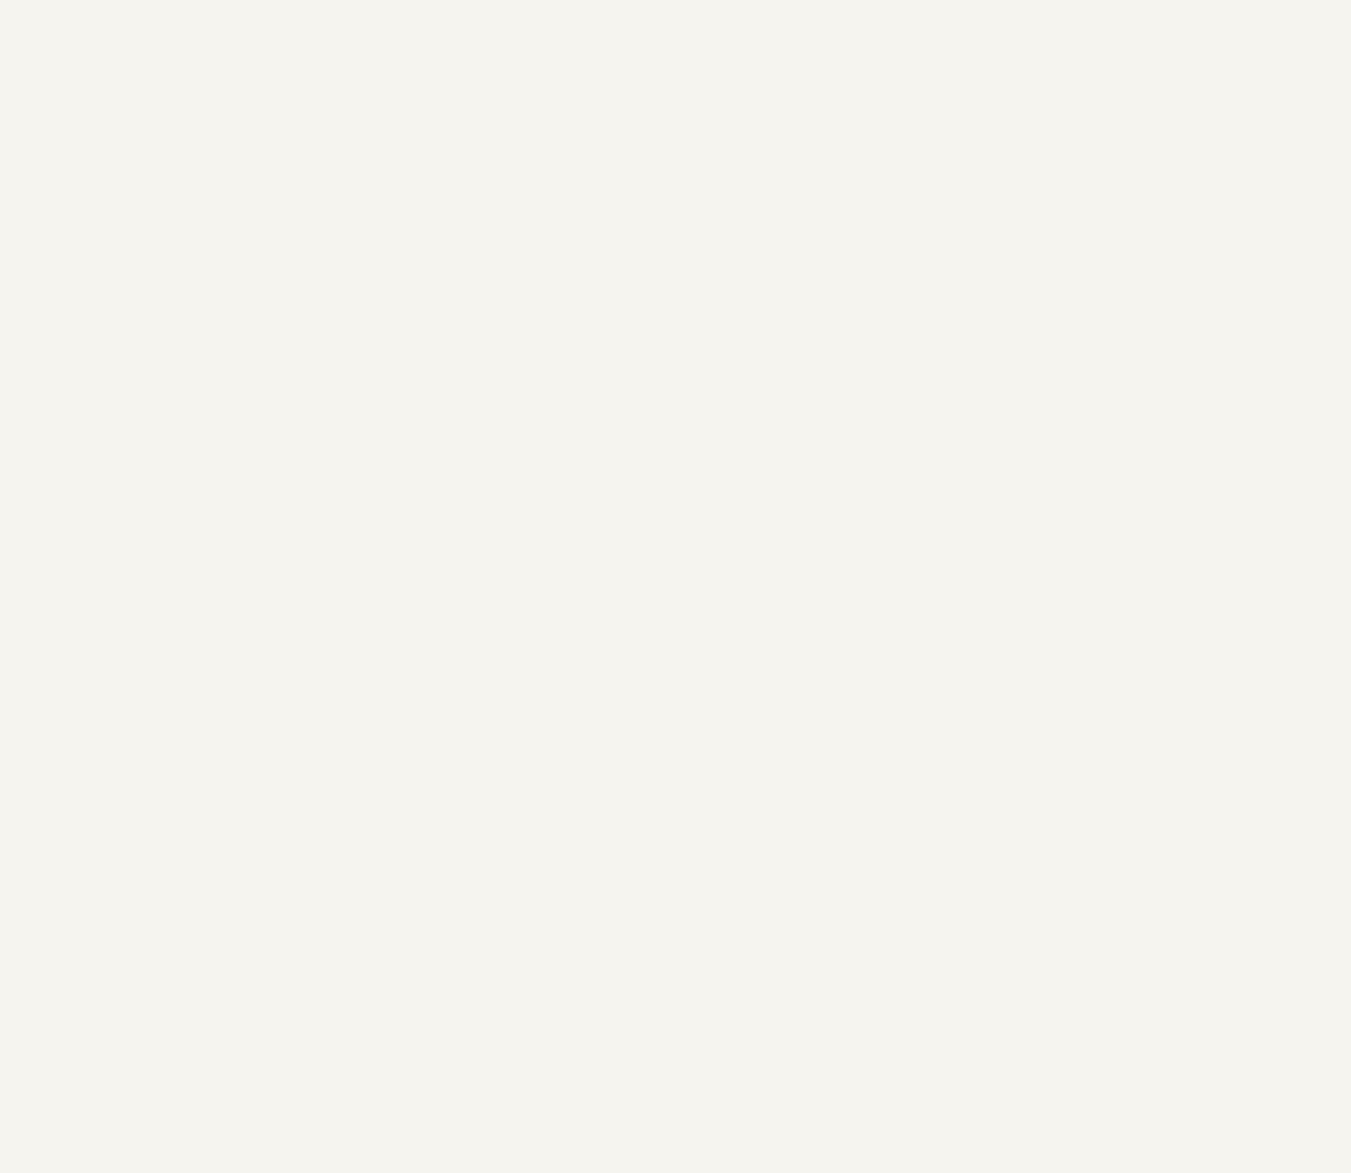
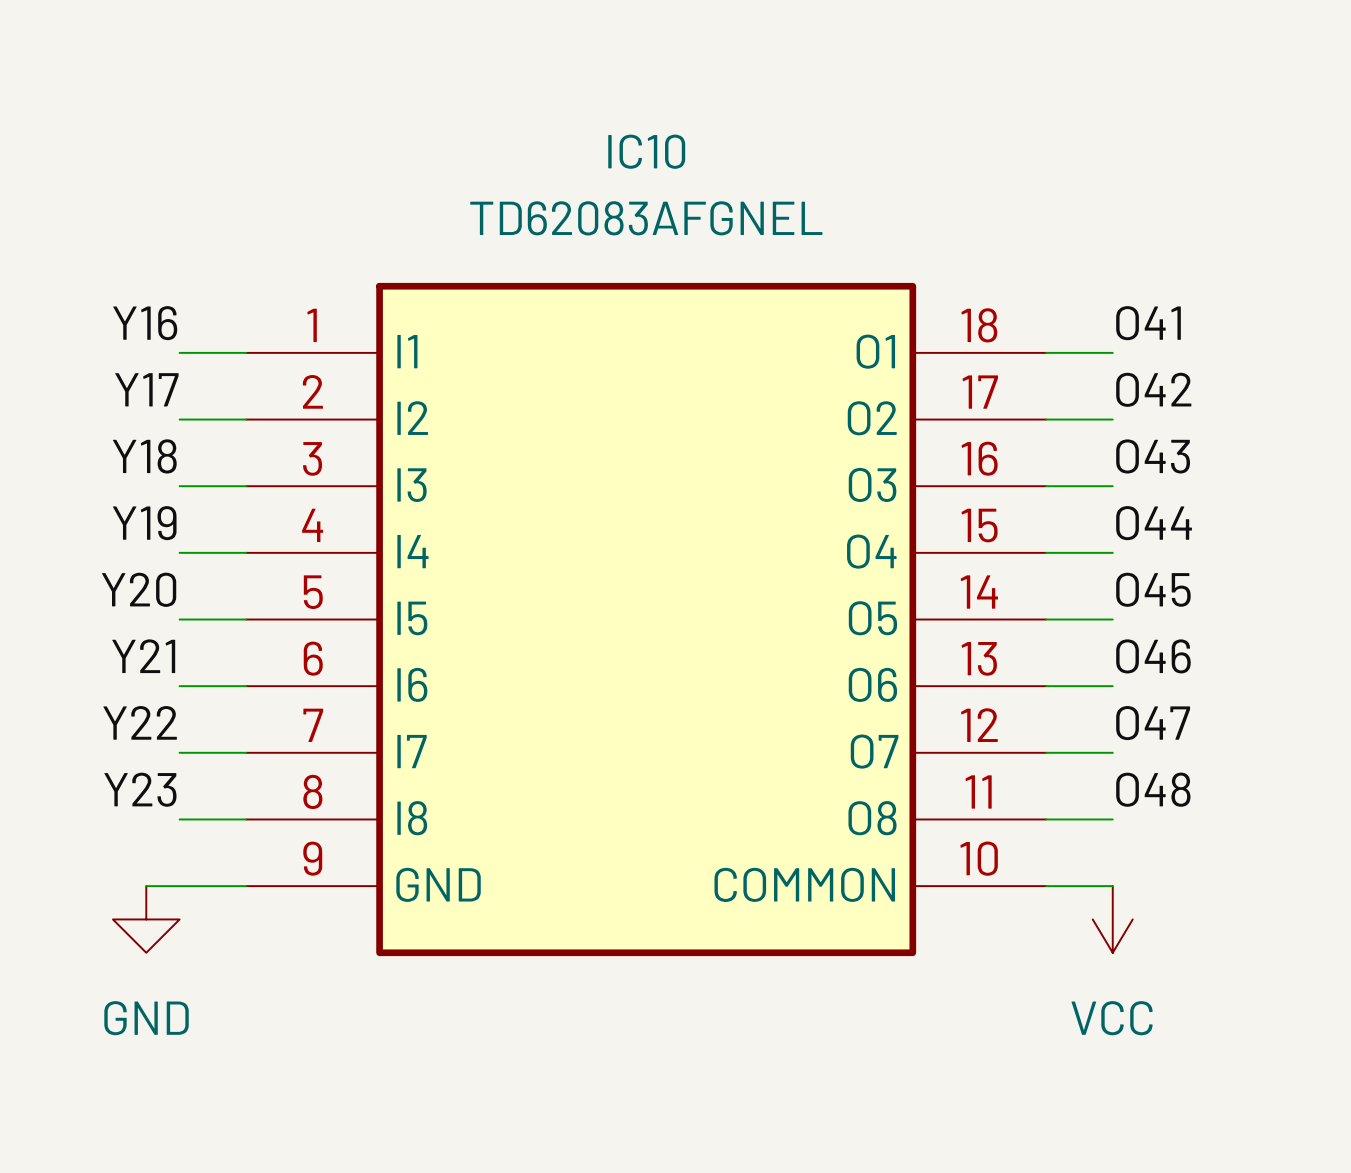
label: none -> Y16 (145, 323)
label: none -> O41 (1148, 323)
wire: none -> (179, 352) (246, 352)
wire: none -> (1046, 352) (1112, 352)
label: none -> Y17 (146, 389)
label: none -> O42 (1153, 389)
wire: none -> (179, 419) (246, 419)
wire: none -> (1046, 419) (1112, 419)
label: none -> Y18 (144, 456)
label: none -> O43 (1153, 456)
wire: none -> (179, 486) (246, 486)
wire: none -> (1046, 486) (1112, 486)
label: none -> Y19 (144, 523)
label: none -> O44 (1154, 523)
wire: none -> (179, 552) (246, 552)
wire: none -> (1046, 552) (1112, 552)
label: none -> Y20 (139, 589)
label: none -> O45 (1153, 589)
wire: none -> (179, 619) (246, 619)
IC10: none -> TD62083AFGNEL (646, 619)
wire: none -> (1046, 619) (1112, 619)
label: none -> Y21 (143, 656)
label: none -> O46 (1153, 656)
wire: none -> (179, 686) (246, 686)
wire: none -> (1046, 686) (1112, 686)
label: none -> Y22 (140, 722)
label: none -> O47 (1153, 723)
wire: none -> (179, 752) (246, 752)
wire: none -> (1046, 752) (1112, 752)
label: none -> Y23 (140, 789)
label: none -> O48 (1153, 789)
wire: none -> (179, 819) (246, 819)
wire: none -> (1046, 819) (1112, 819)
wire: none -> (146, 886) (246, 886)
wire: none -> (1046, 886) (1112, 886)
power symbol: none -> GND (146, 919)
power symbol: none -> VCC (1112, 919)

